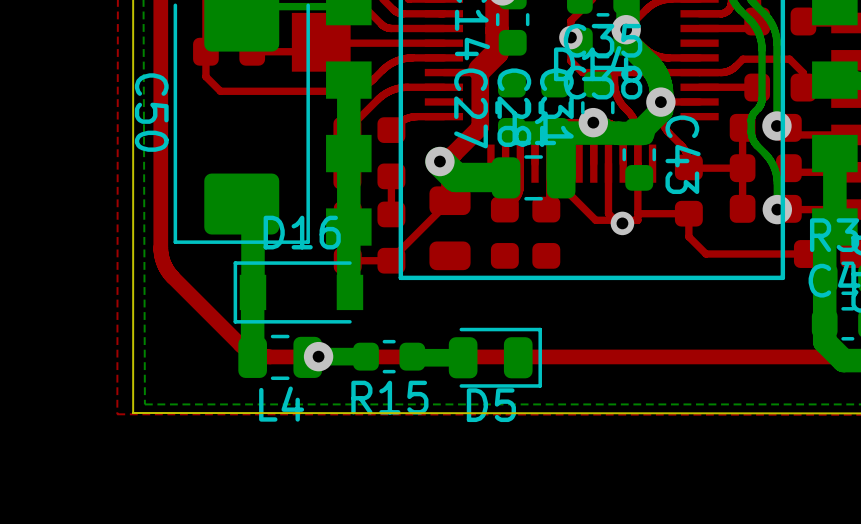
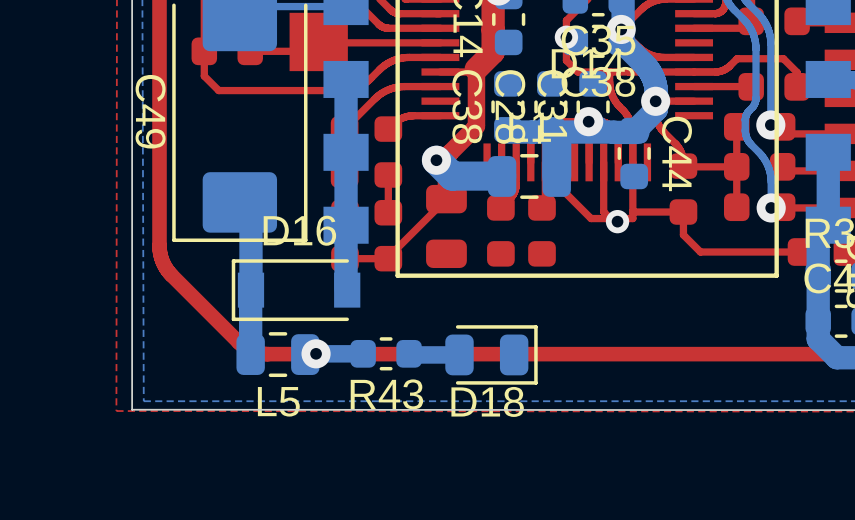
C27 name: C27 (471, 108) -> C38 (467, 107)
C50 name: C50 (151, 112) -> C49 (150, 111)
C43 name: C43 (683, 154) -> C44 (676, 153)
R15 name: R15 (389, 397) -> R43 (386, 394)
L4 name: L4 (281, 404) -> L5 (278, 401)
D5 name: D5 (491, 405) -> D18 (487, 401)

